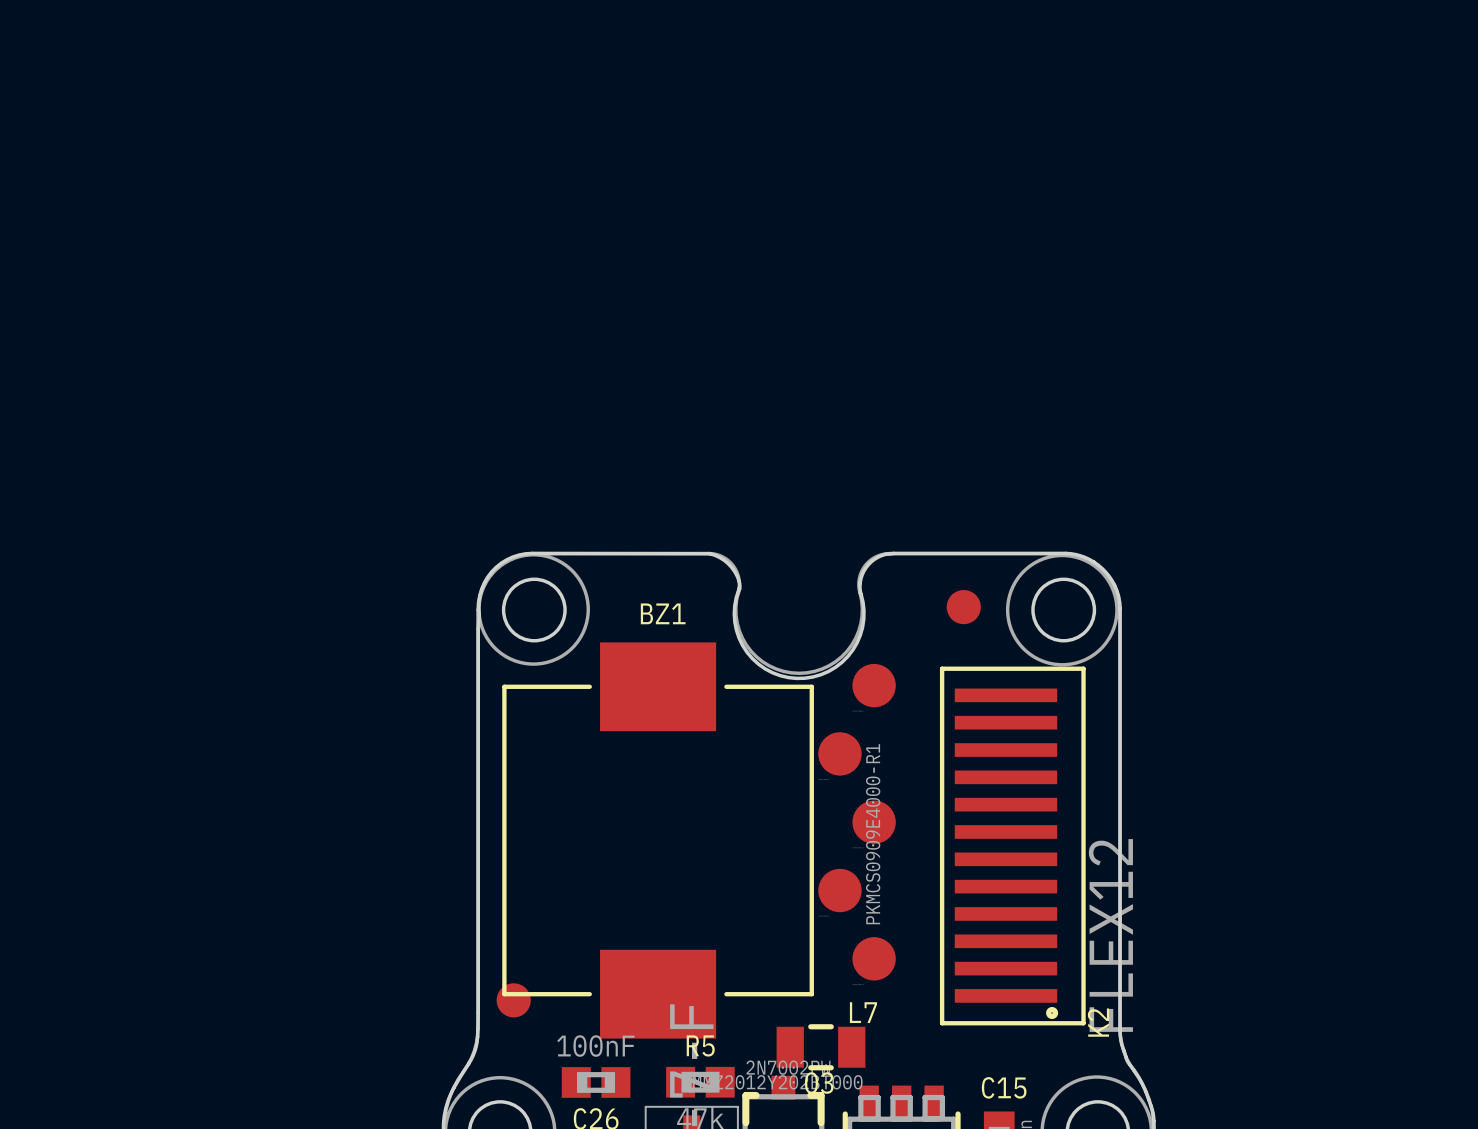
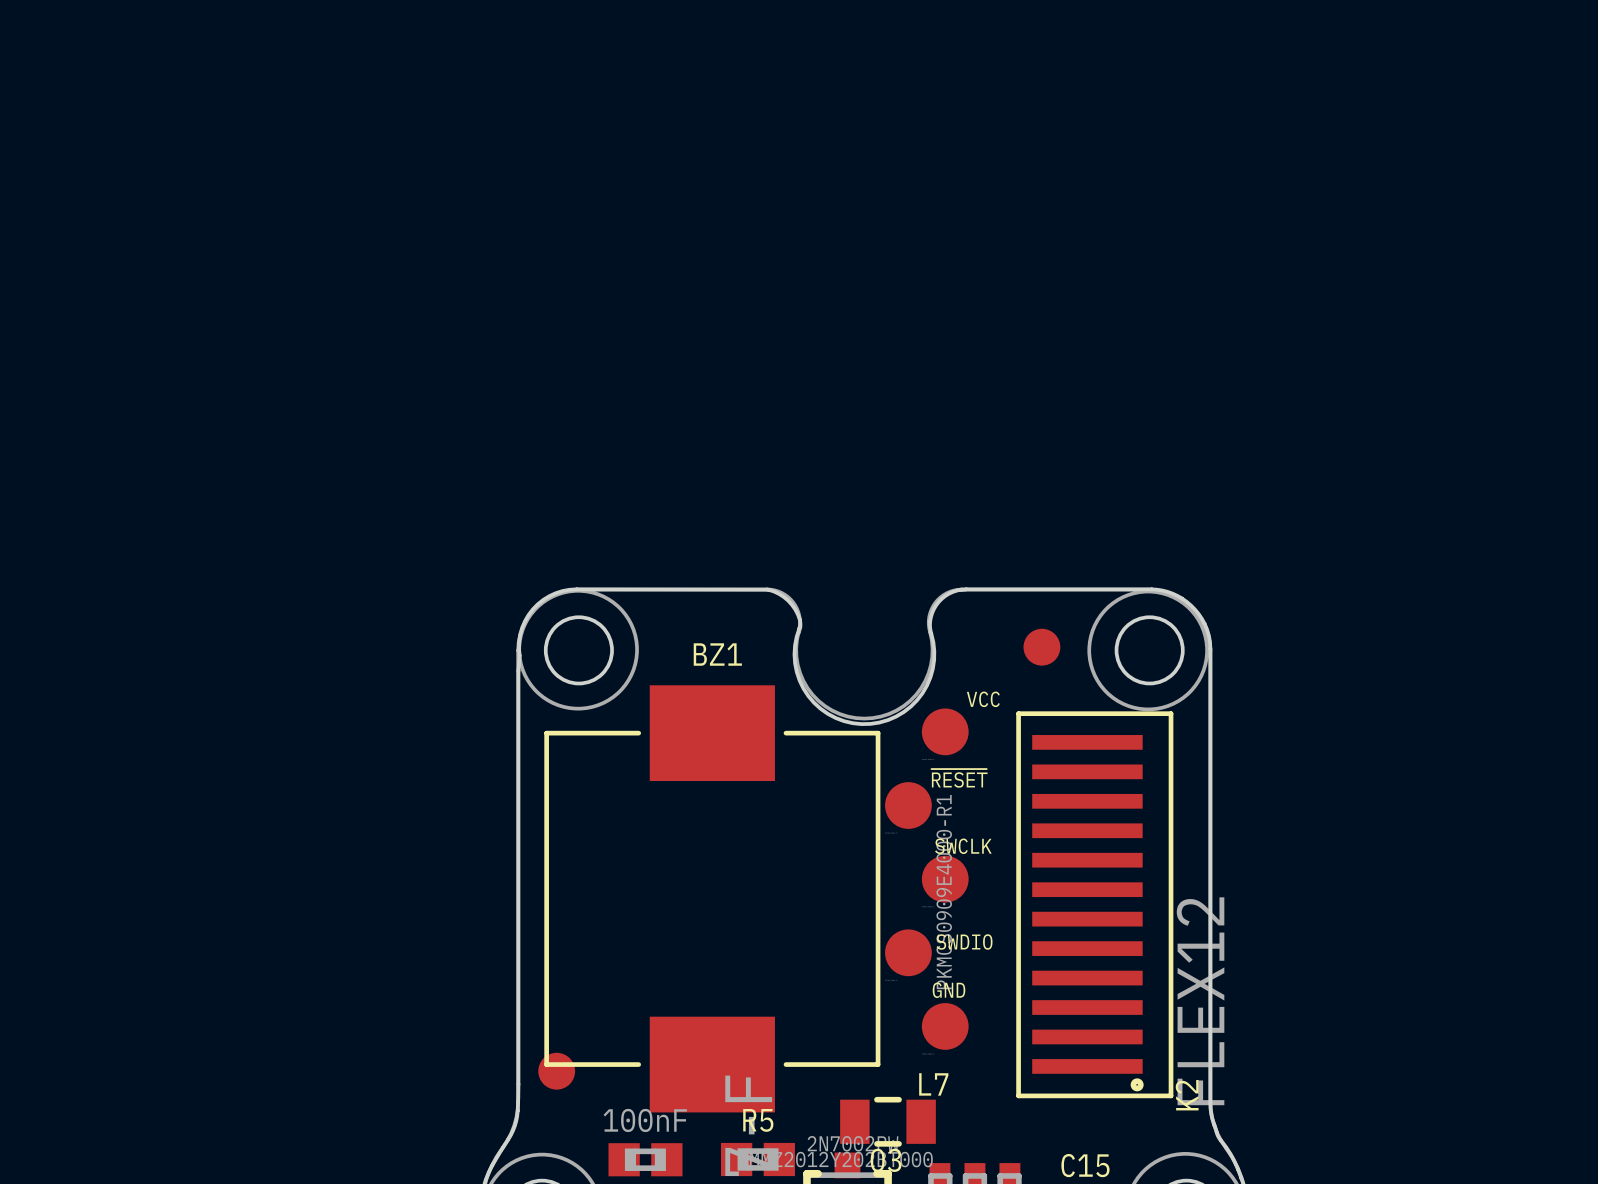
text: none -> VCC (983, 699)
text: none -> ~{RESET} (959, 778)
text: none -> SWCLK (963, 846)
text: none -> SWDIO (964, 942)
text: none -> GND (949, 990)

